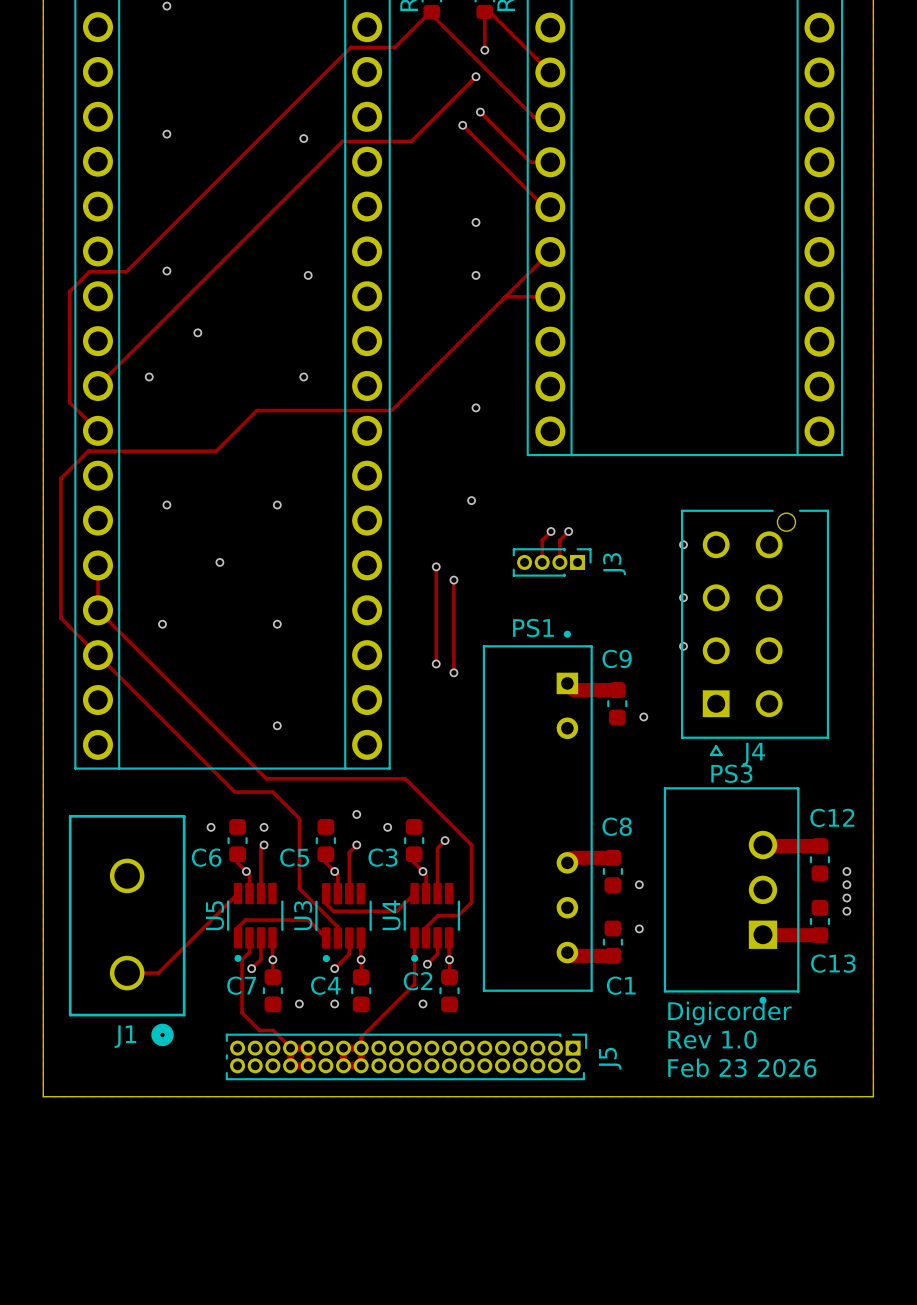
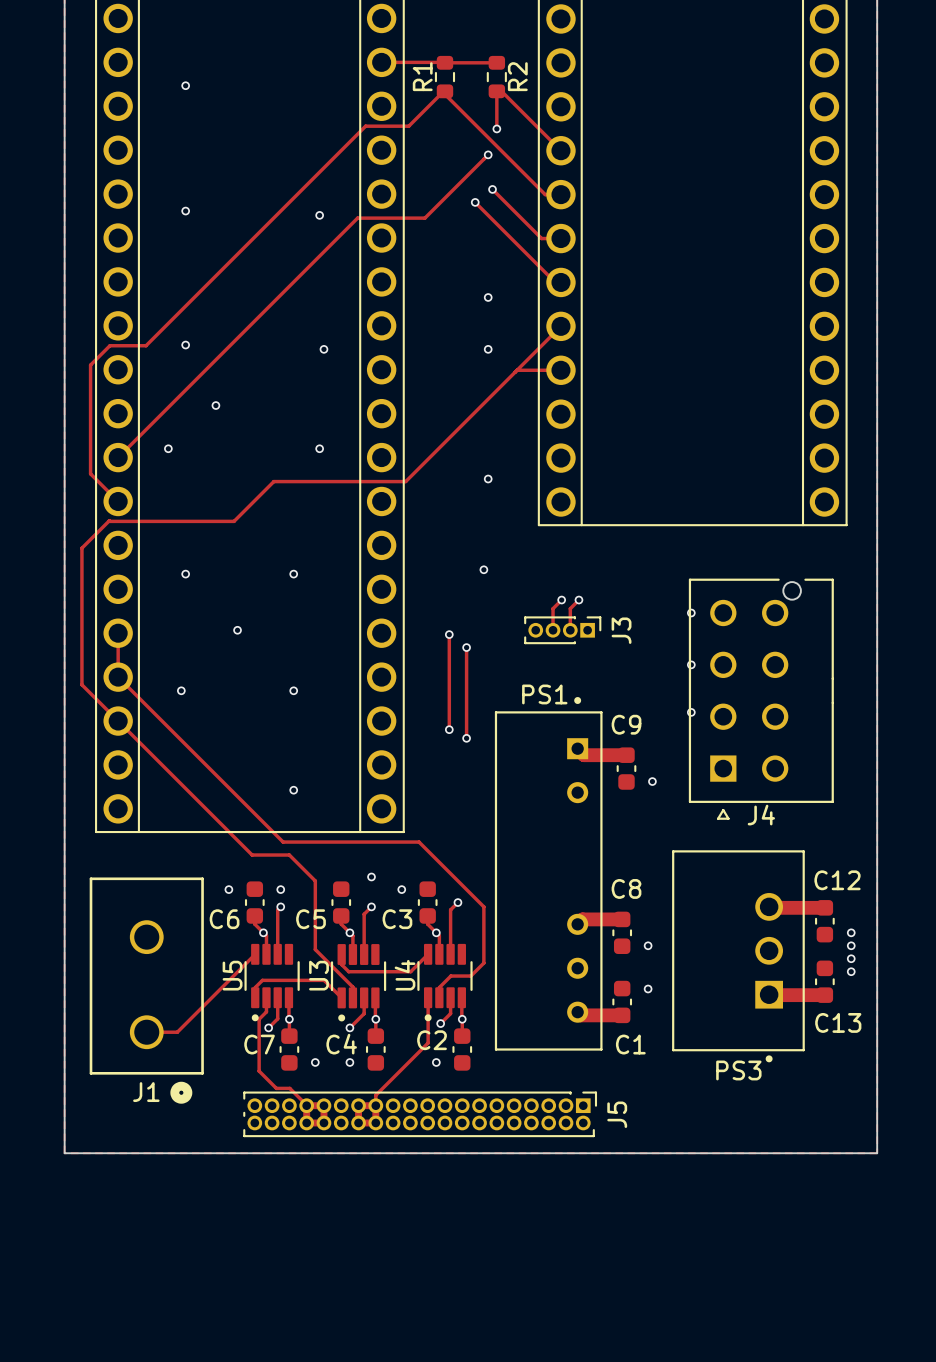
PS3 name position: PS3 (731, 773) -> PS3 (738, 1070)
text: Digicorder (729, 1013) -> none
text: Rev 1.0 (712, 1039) -> none
text: Feb 23 2026 (742, 1067) -> none

